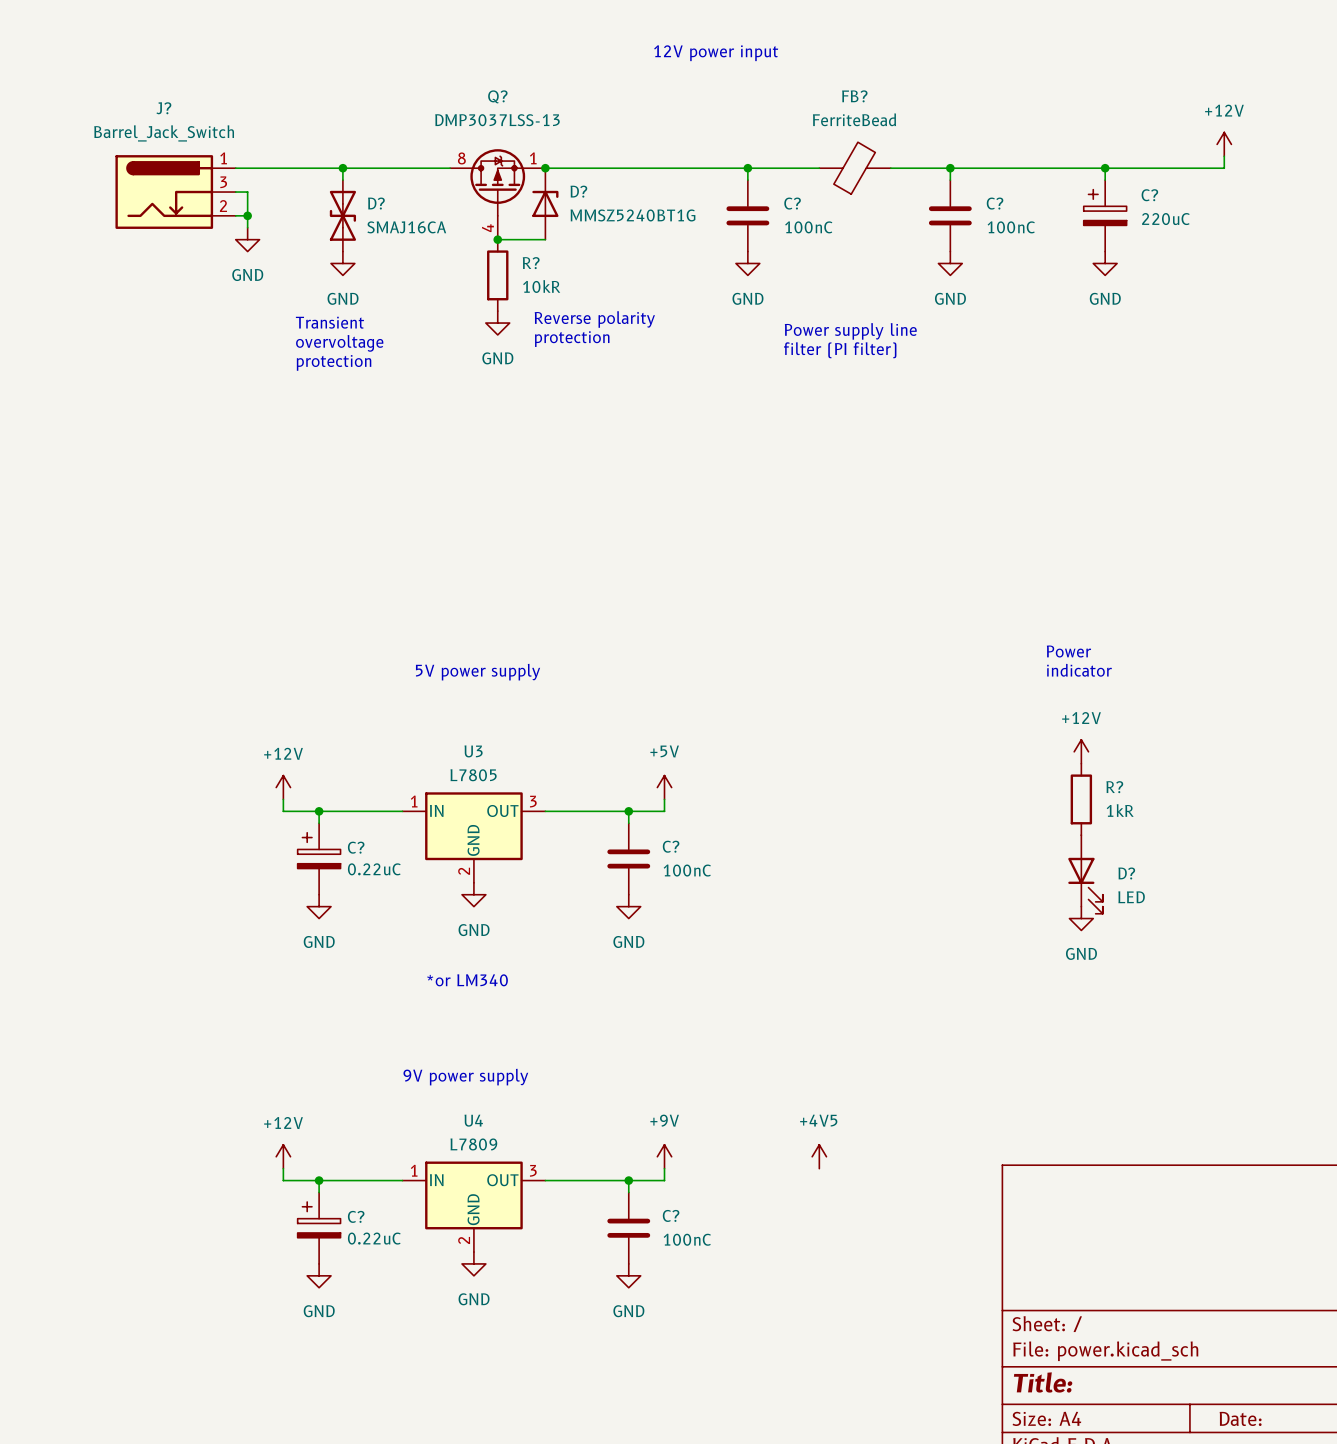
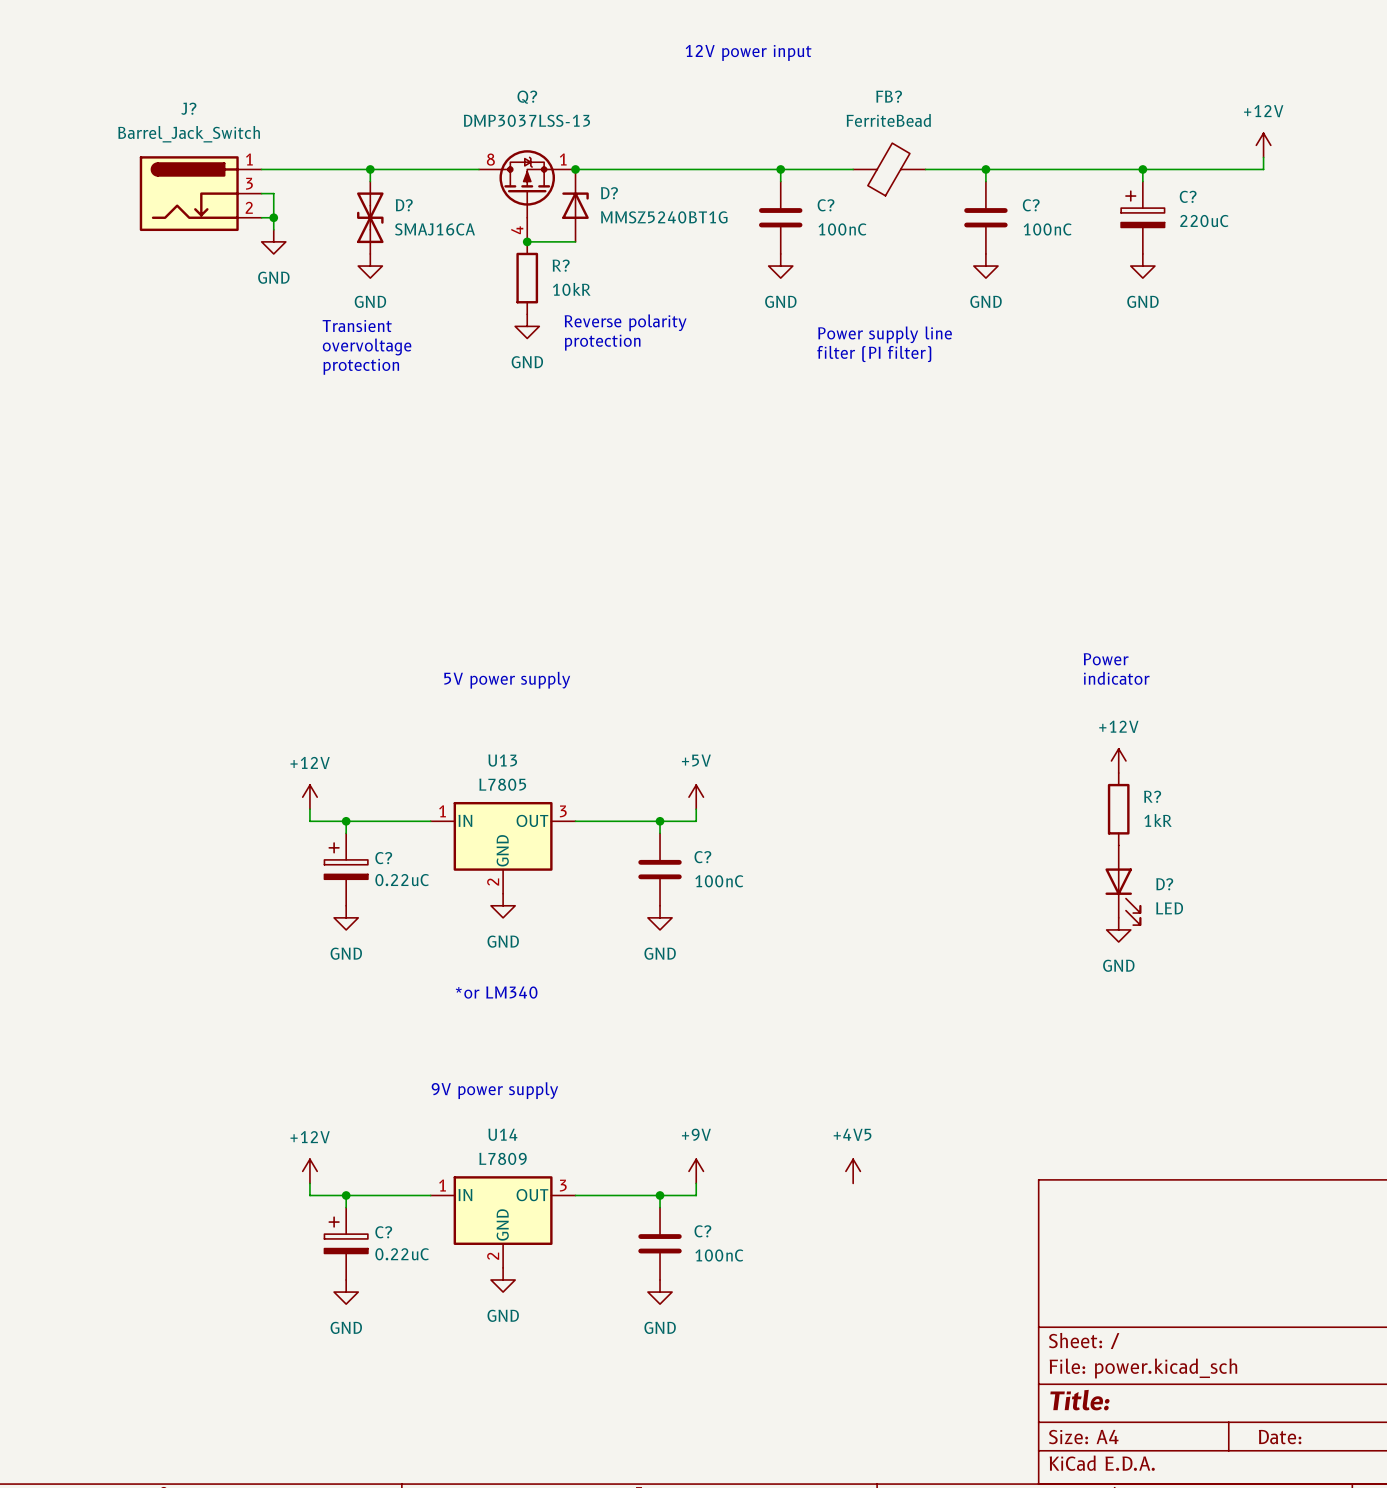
U3 name: U3 (473, 751) -> U13 (502, 760)
U4 name: U4 (473, 1120) -> U14 (502, 1134)

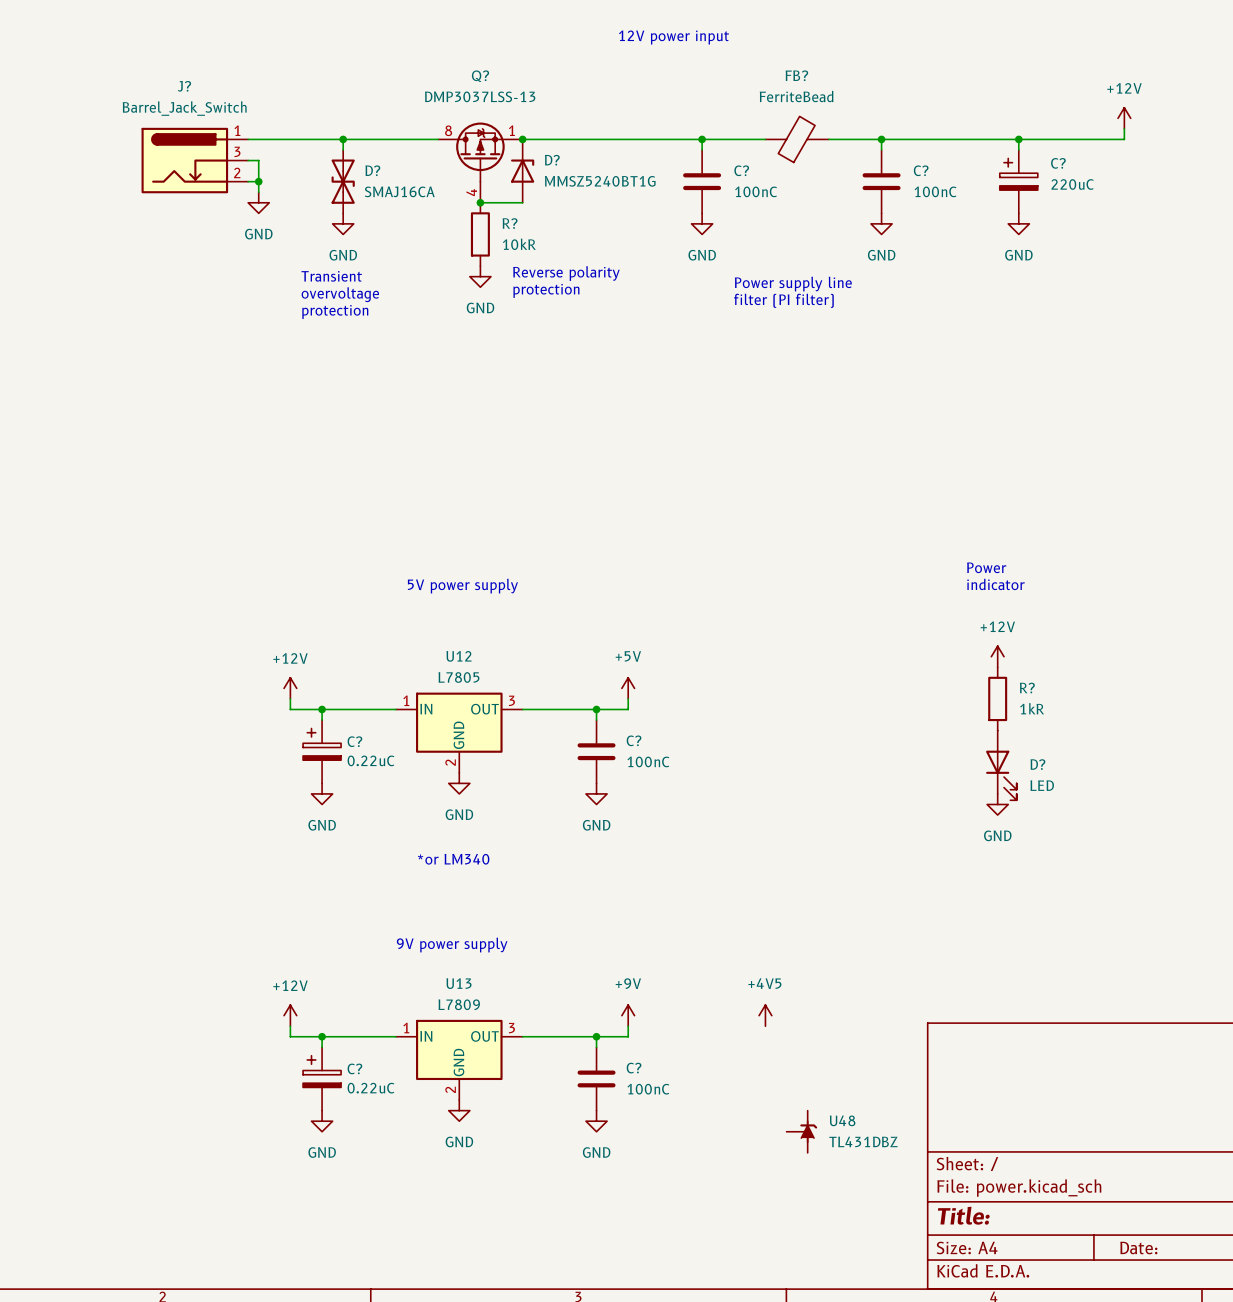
U13 name: U13 (502, 760) -> U12 (458, 656)
U14 name: U14 (502, 1134) -> U13 (458, 983)
U48: none -> TL431DBZ (801, 1131)

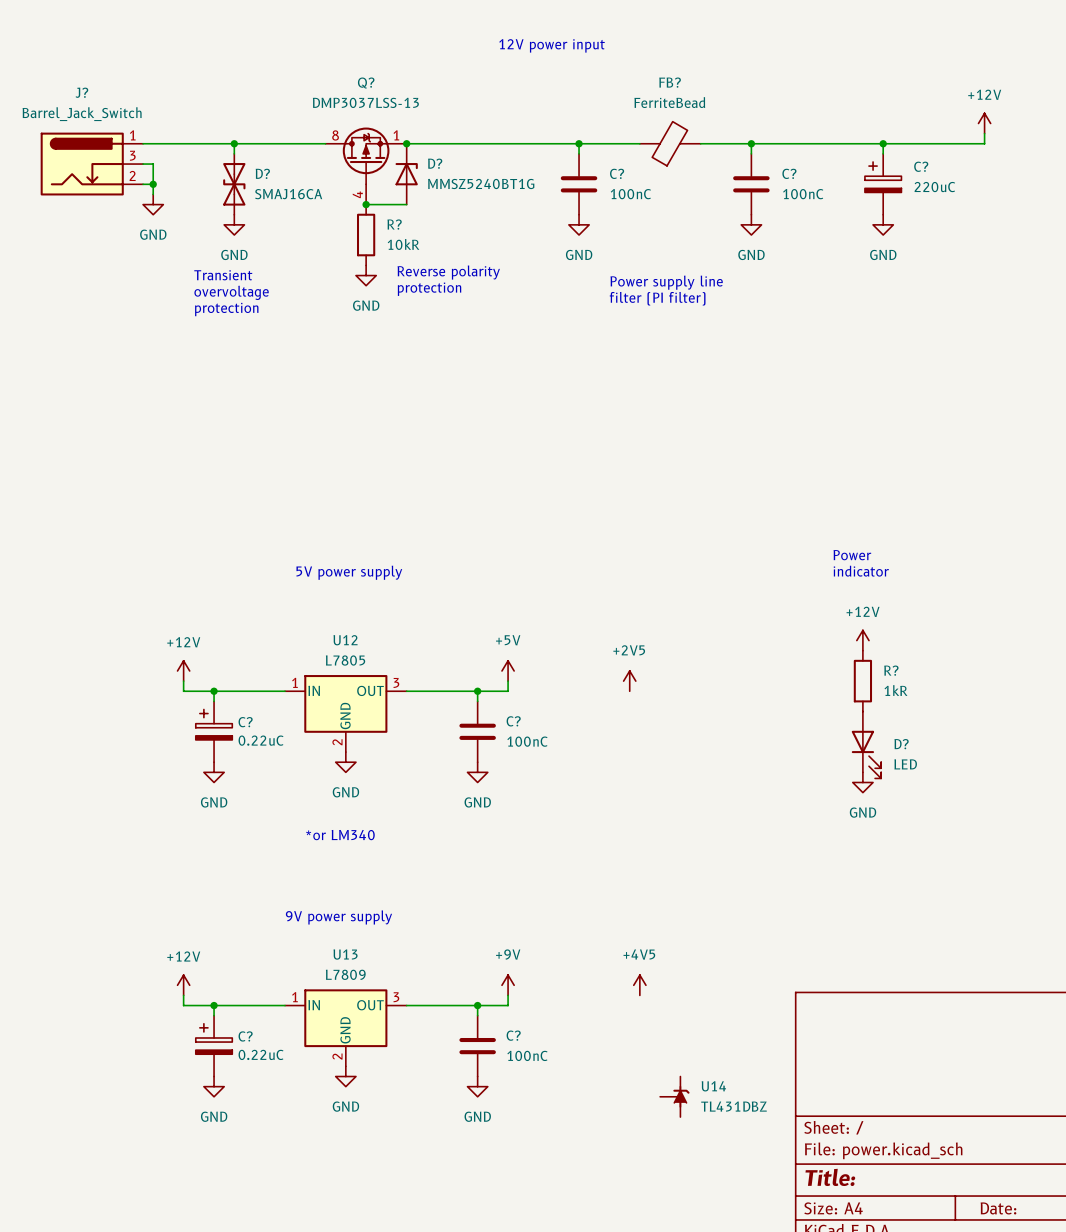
power symbol: none -> +2V5 (629, 681)
U48 name: U48 (842, 1120) -> U14 (713, 1086)

